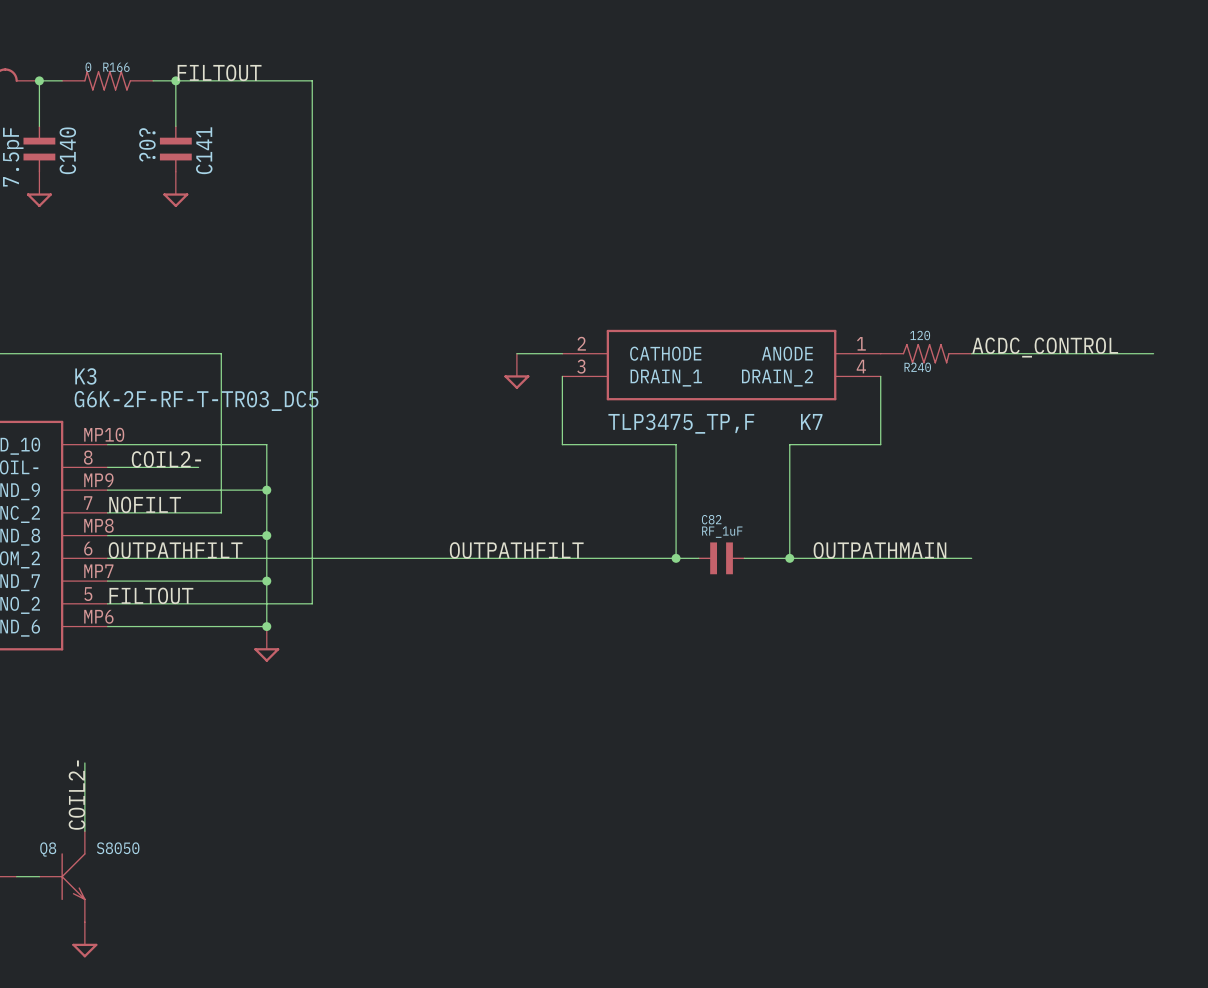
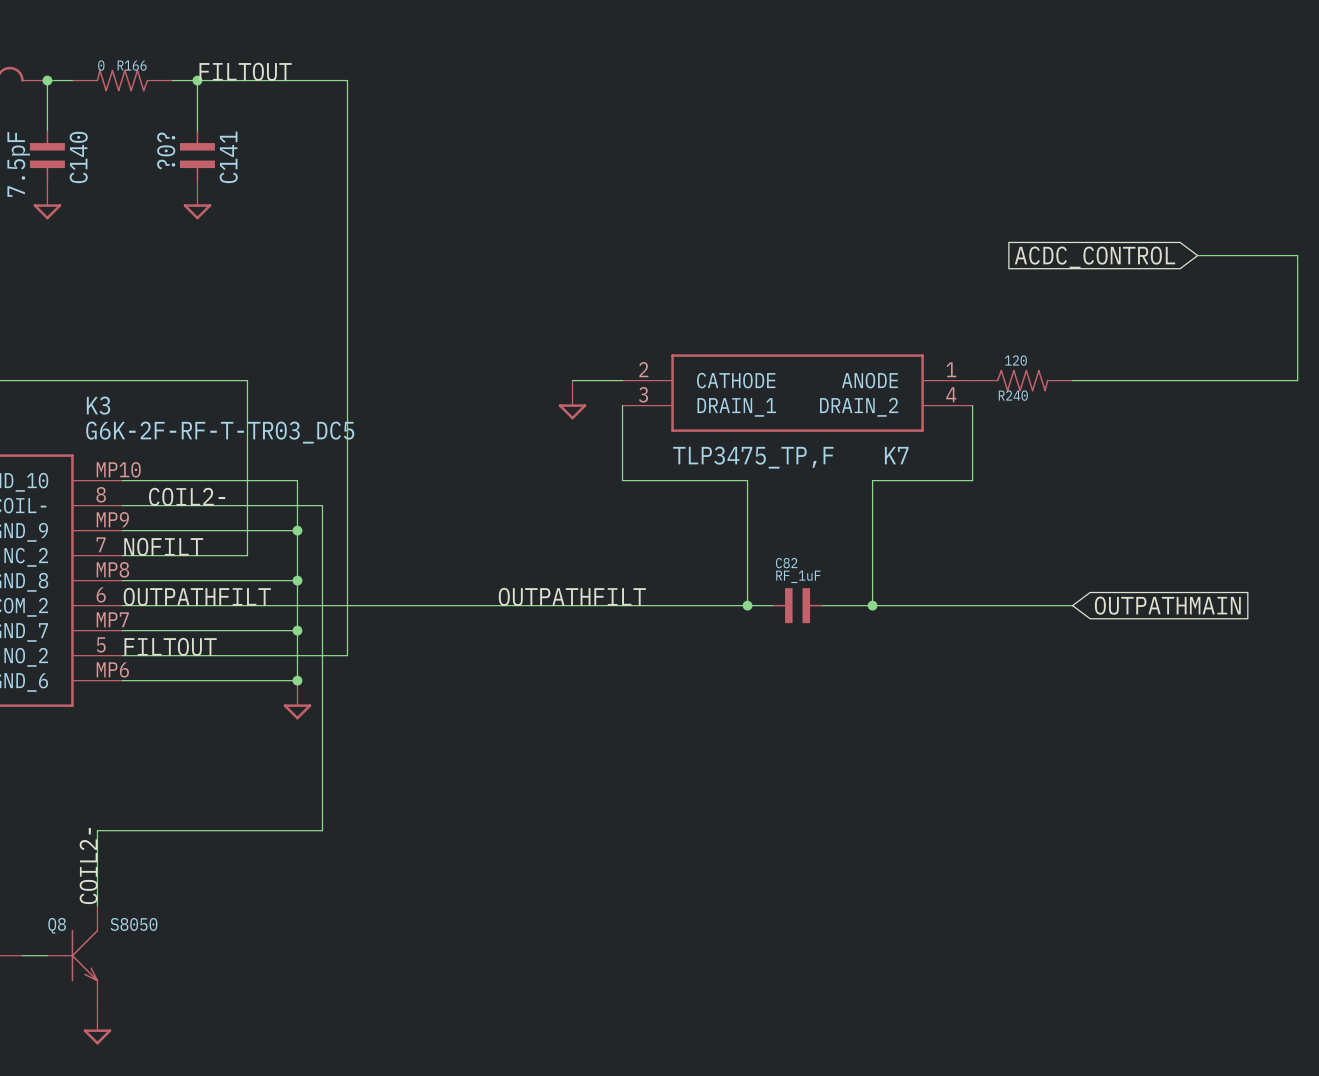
wire: none -> (1197, 255) (1297, 255) (1297, 380) (1272, 380)
global label: none -> ACDC_CONTROL (1094, 257)
label: ACDC_CONTROL (1045, 347) -> none
wire: none -> (222, 505) (322, 505) (322, 830) (97, 830)
label: OUTPATHMAIN (879, 550) -> none
global label: none -> OUTPATHMAIN (1167, 605)

